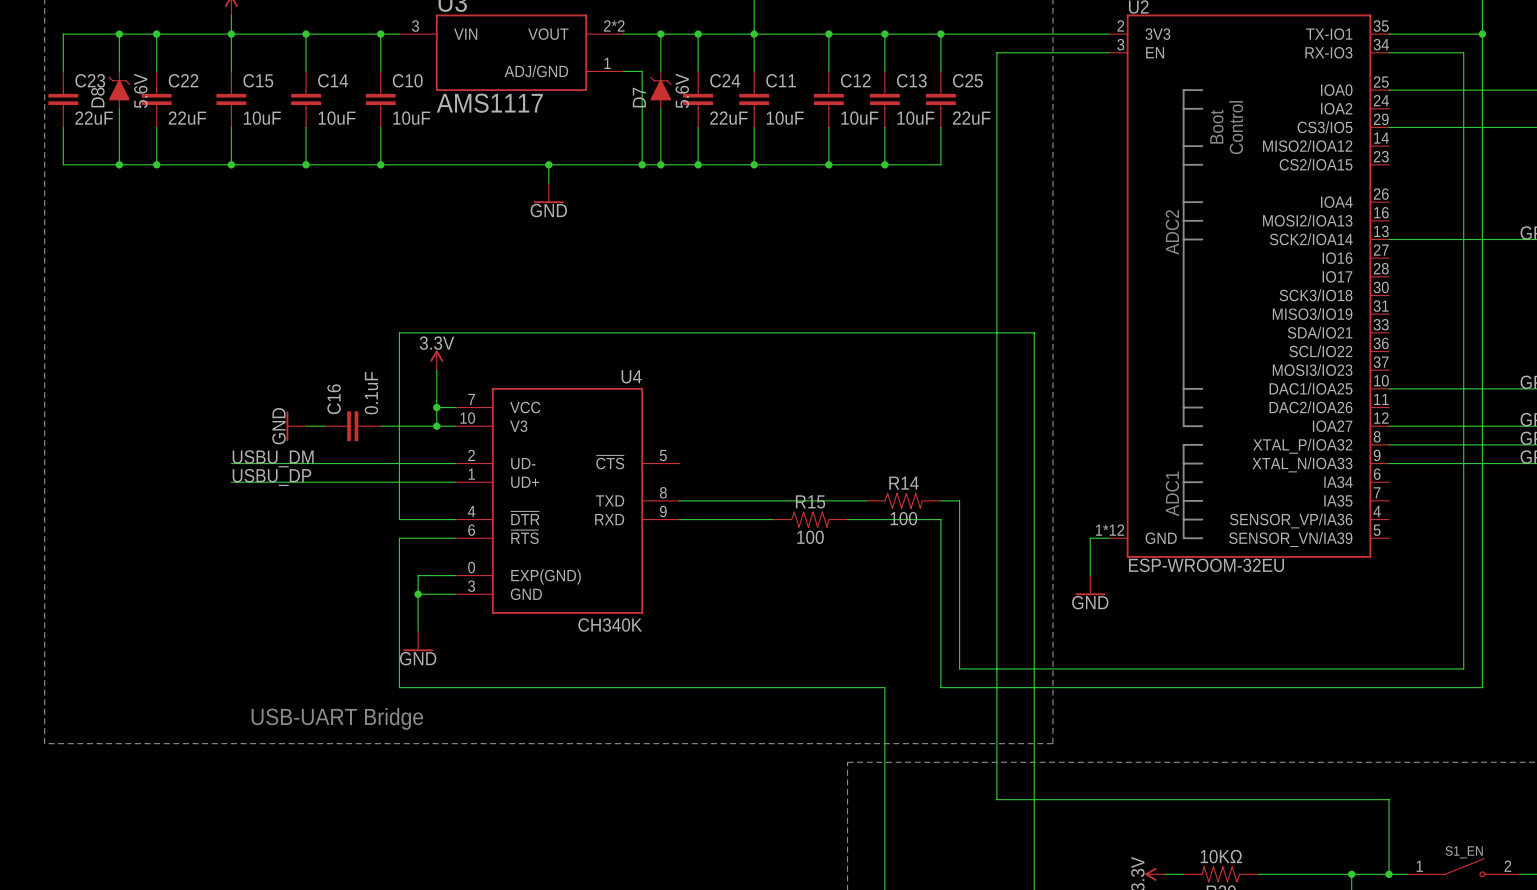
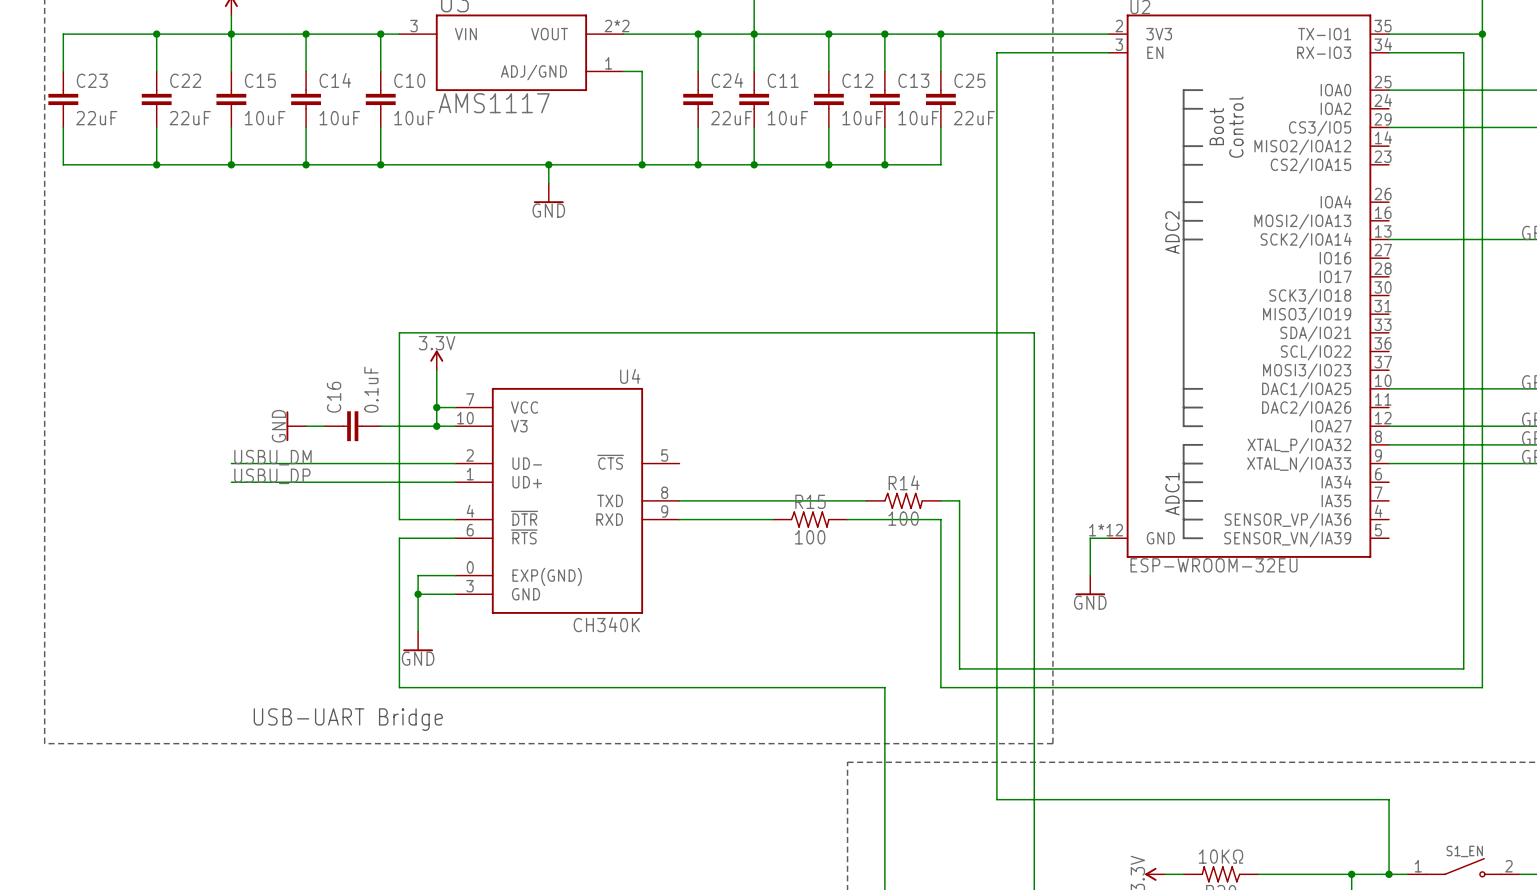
wire: (119, 34) (119, 71) -> none
junction: (119, 34) -> none
wire: (660, 34) (660, 71) -> none
junction: (660, 34) -> none
D8: 5.6V (119, 90) -> none
D7: 5.6V (660, 90) -> none
wire: (119, 108) (119, 164) -> none
wire: (660, 108) (660, 164) -> none
junction: (119, 164) -> none
junction: (660, 164) -> none

